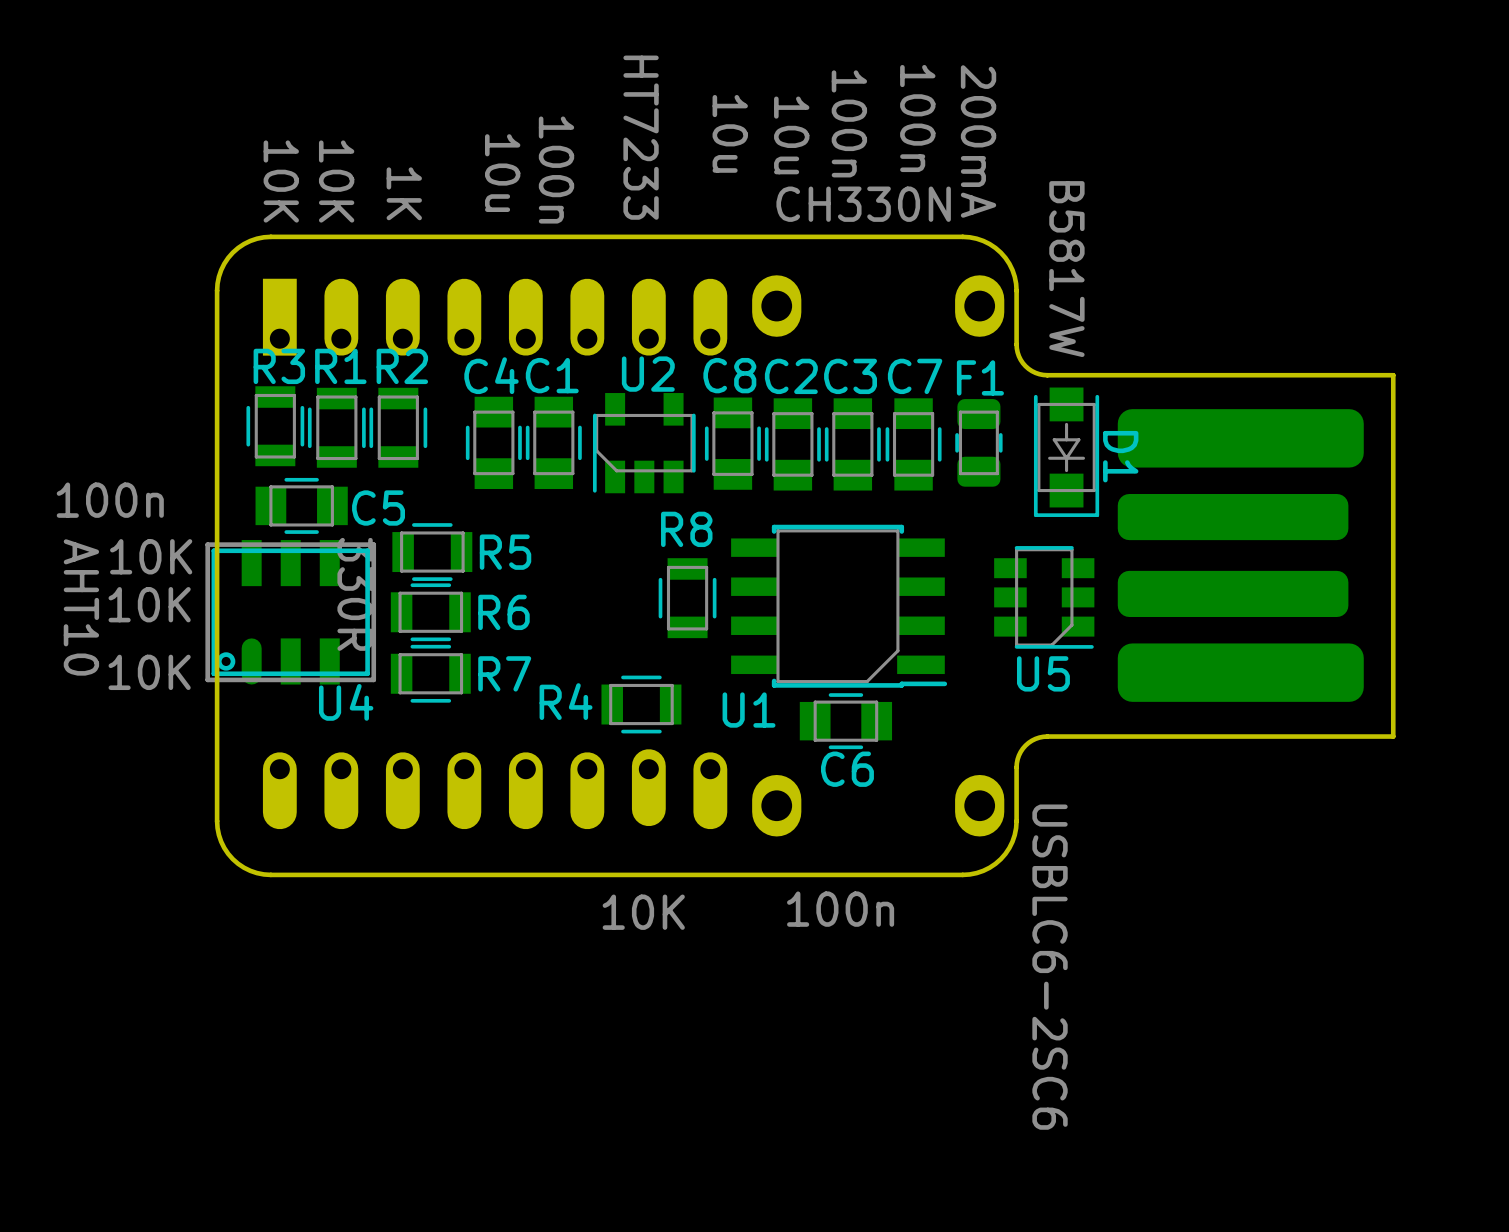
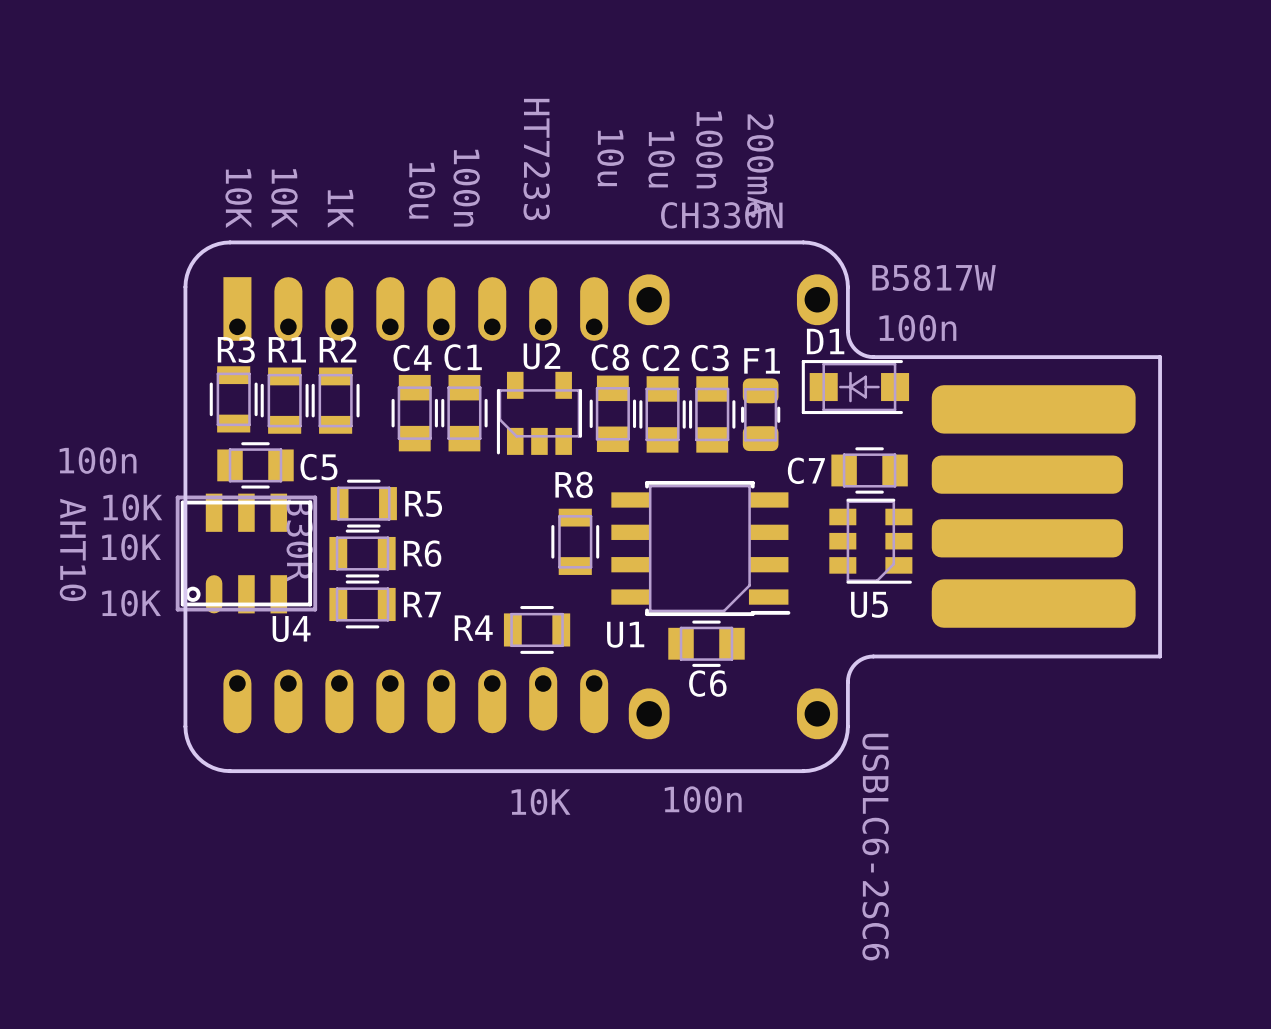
C7 value position: 100n (917, 118) -> 100n (917, 328)
D1 value position: B5817W (1066, 269) -> B5817W (934, 277)
C7 name position: C7 (915, 376) -> C7 (806, 470)
F1 position: (978, 442) -> (760, 414)
C7 rotation: 0° (913, 444) -> 90° clockwise (869, 470)
C7 position: (913, 444) -> (869, 470)
D1 rotation: 0° (1066, 452) -> 90° clockwise (855, 387)
D1 name position: D1 (1120, 456) -> D1 (825, 341)

